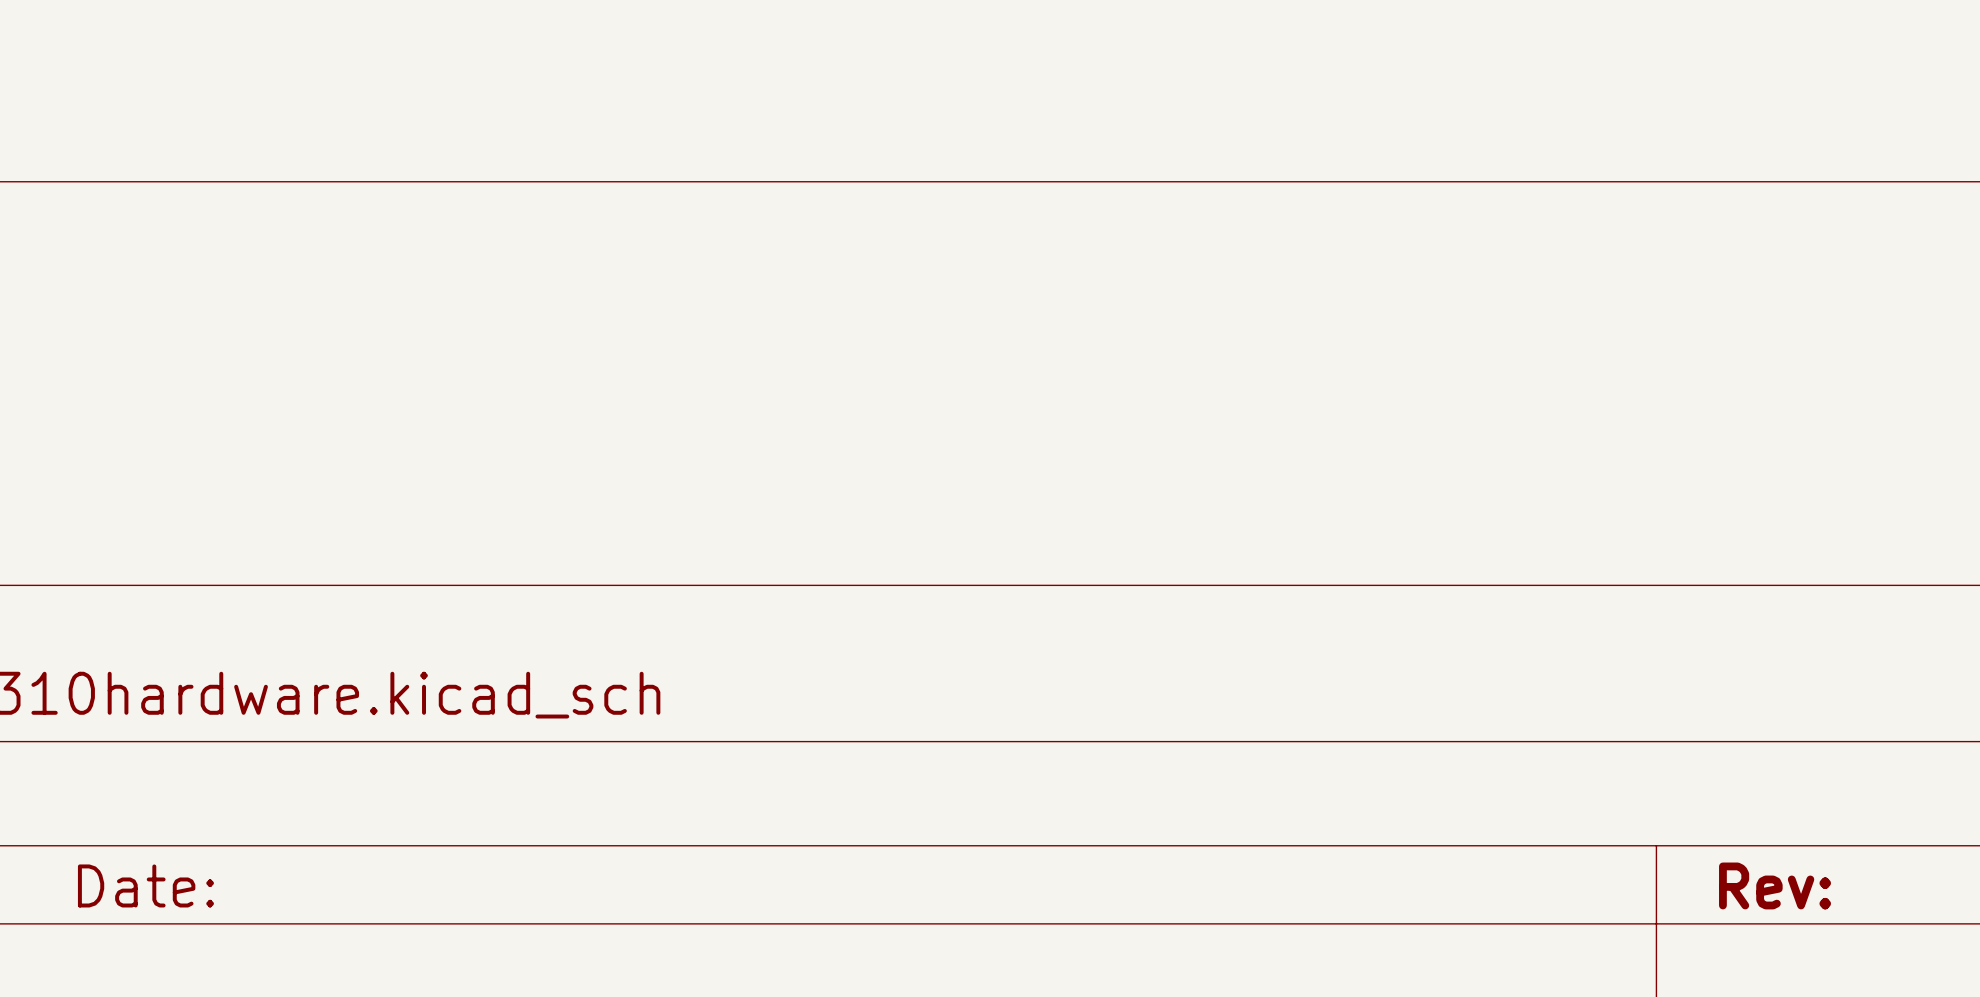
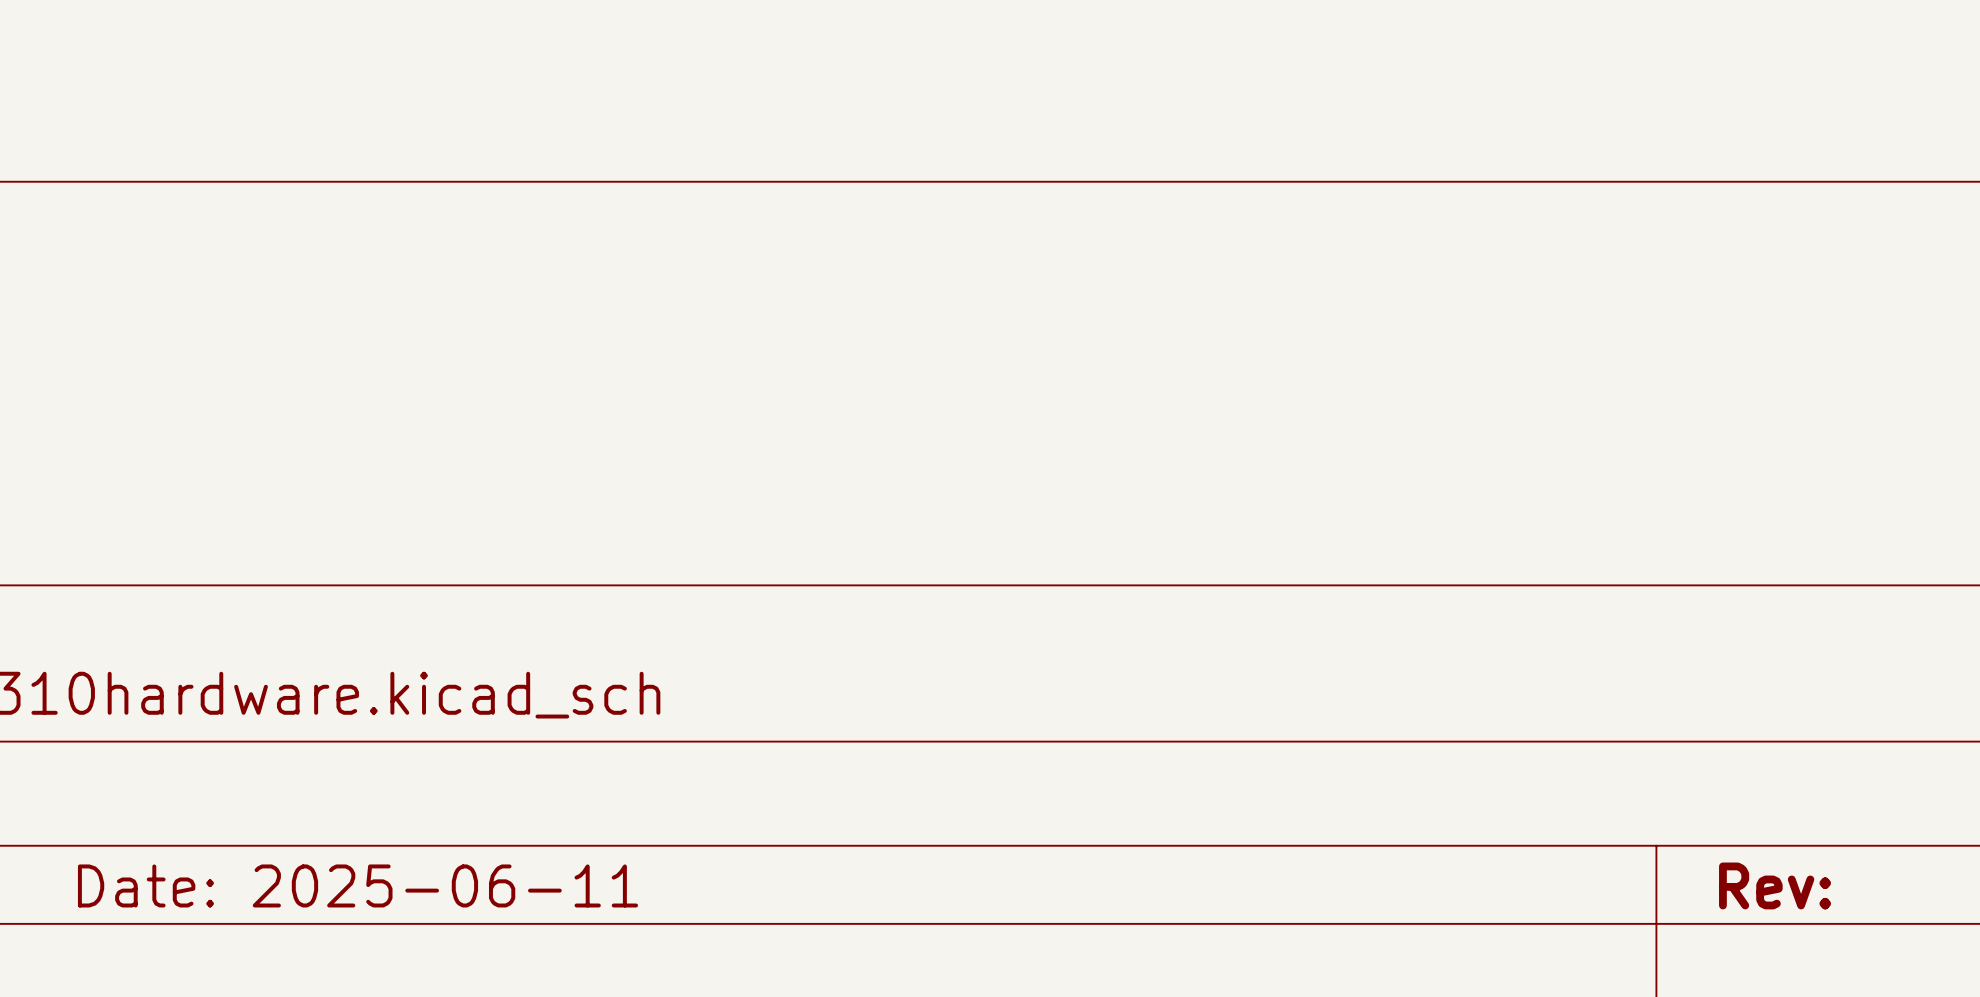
title block: Date: (145, 885) -> Date: 2025-06-11 (357, 885)

